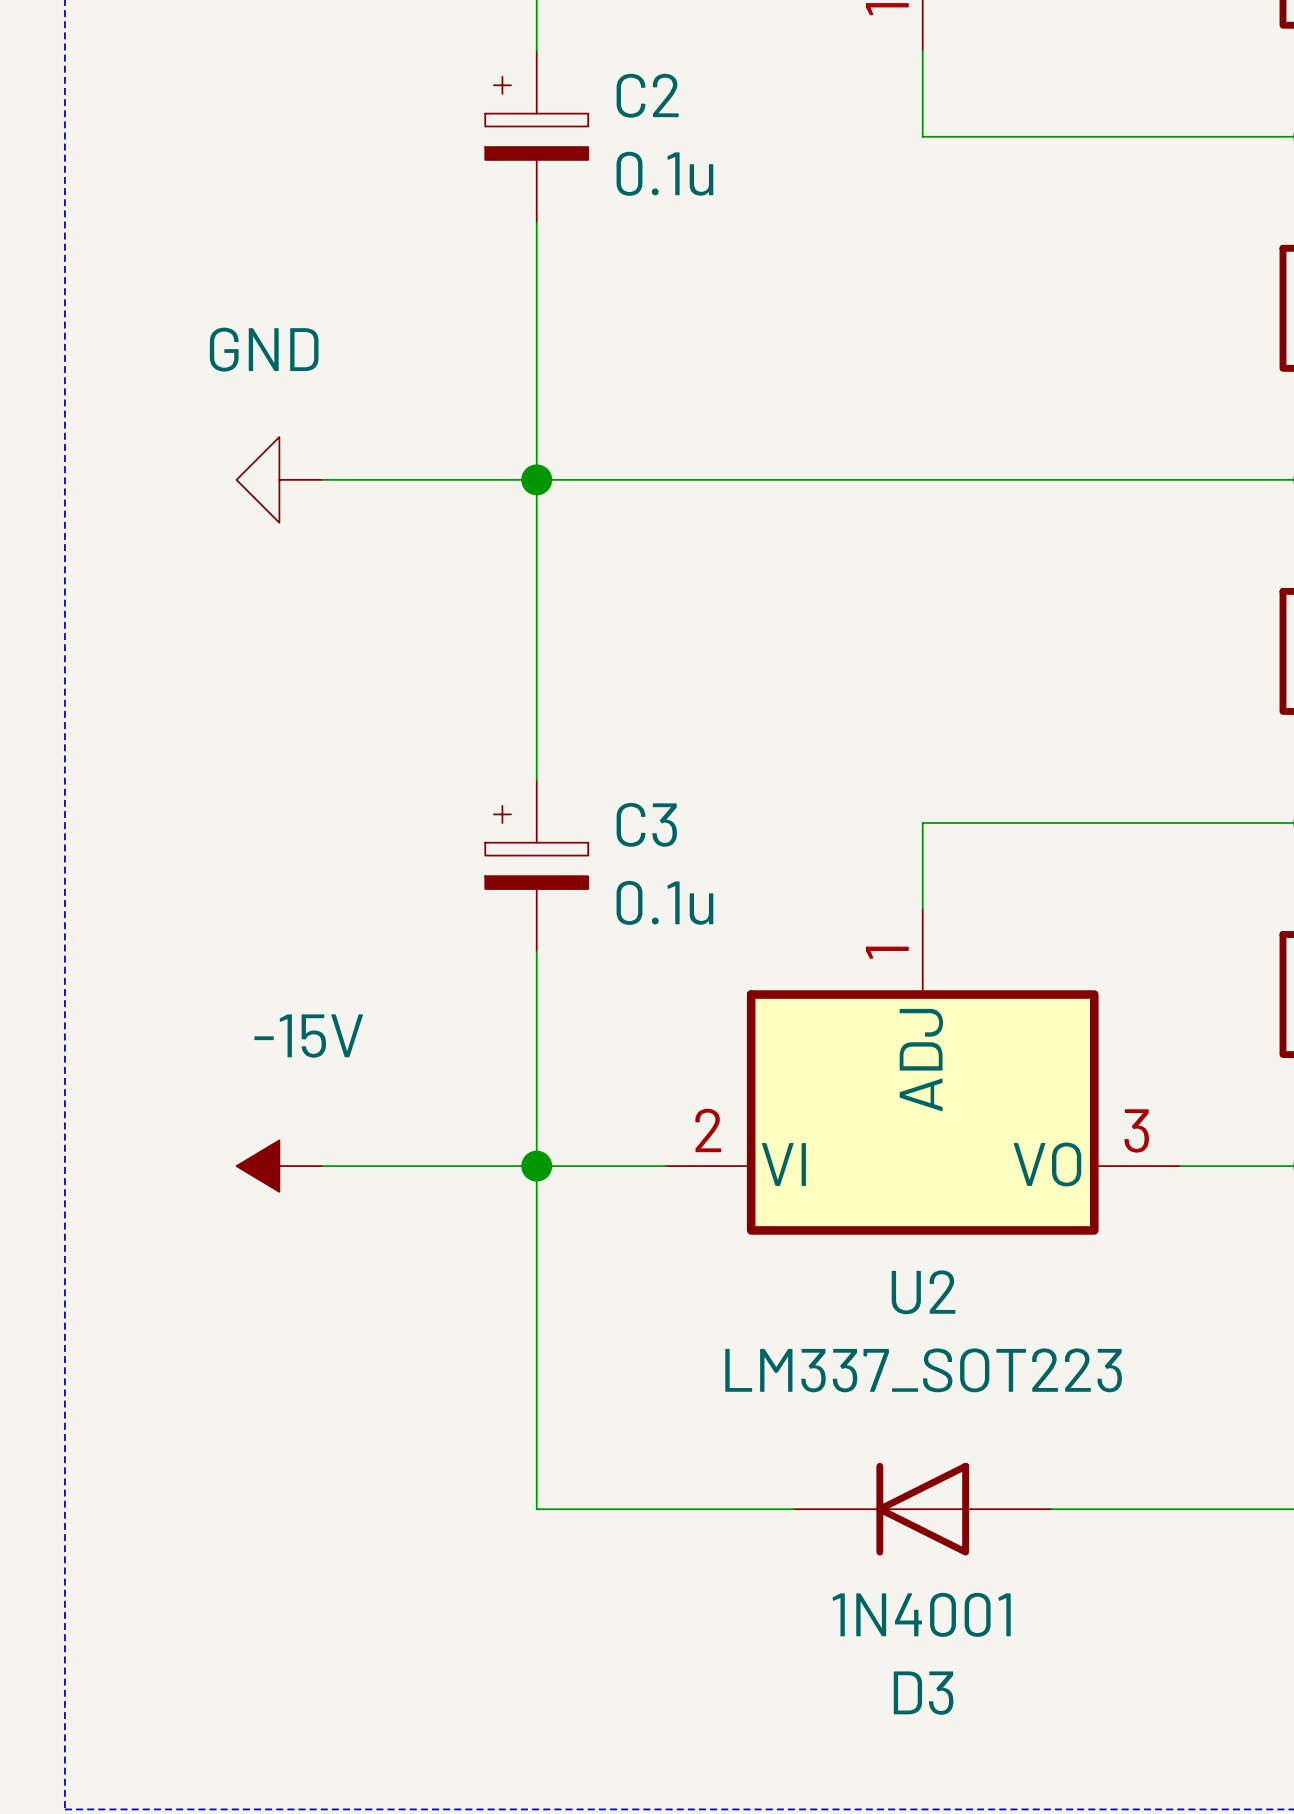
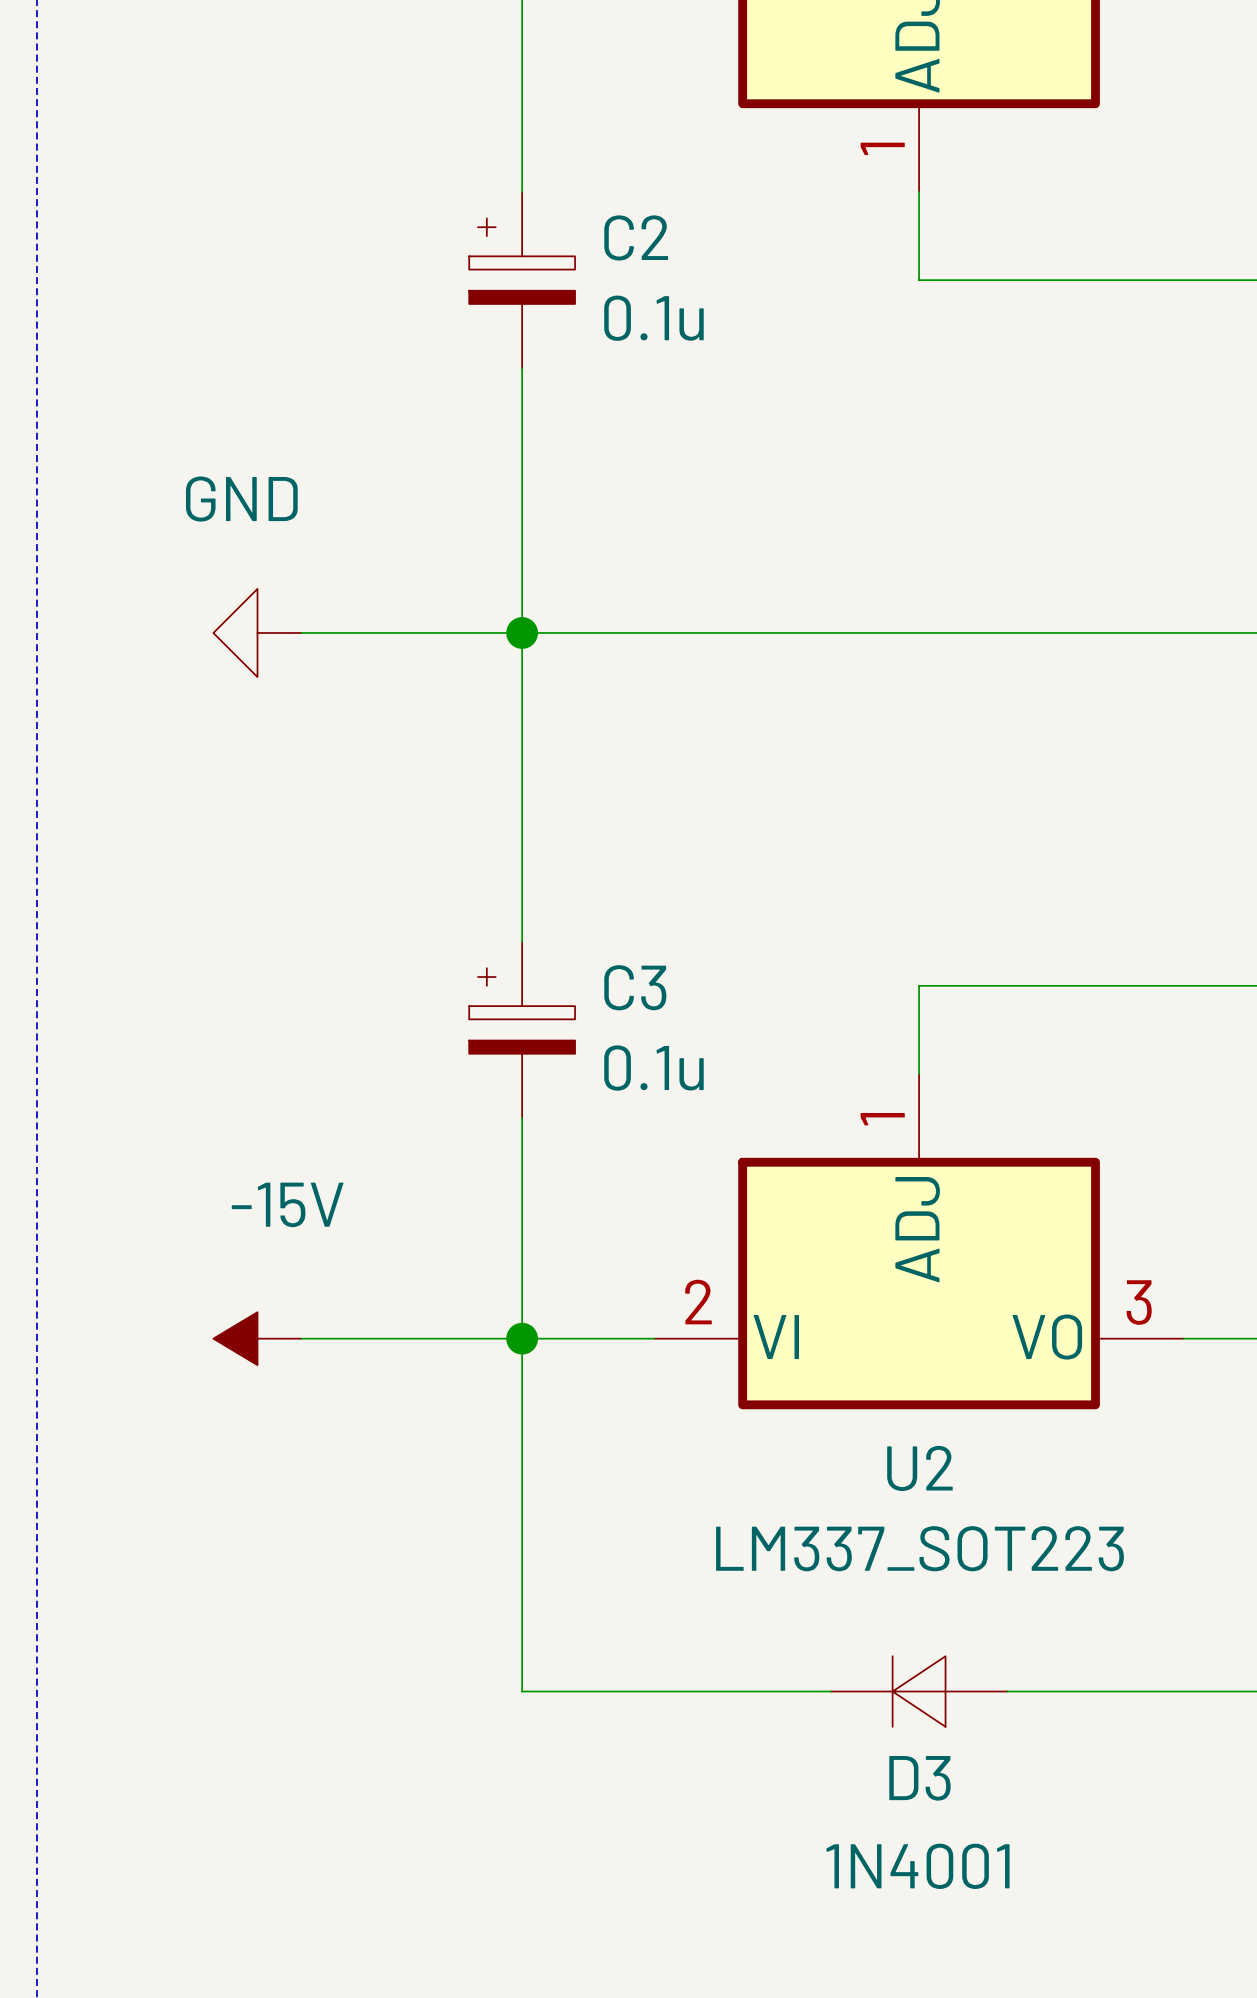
D3 symbol: [794, 1462, 1052, 1556] -> [830, 1656, 1008, 1727]
D3 name position: D3 (923, 1693) -> D3 (919, 1778)

